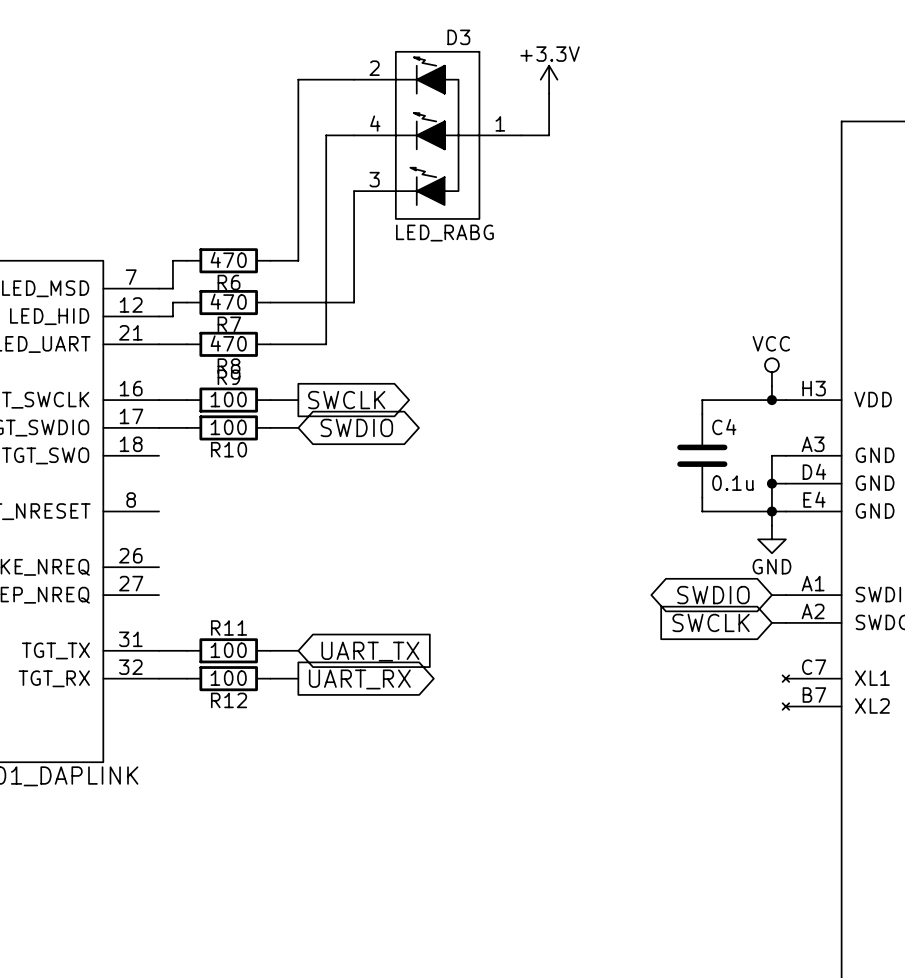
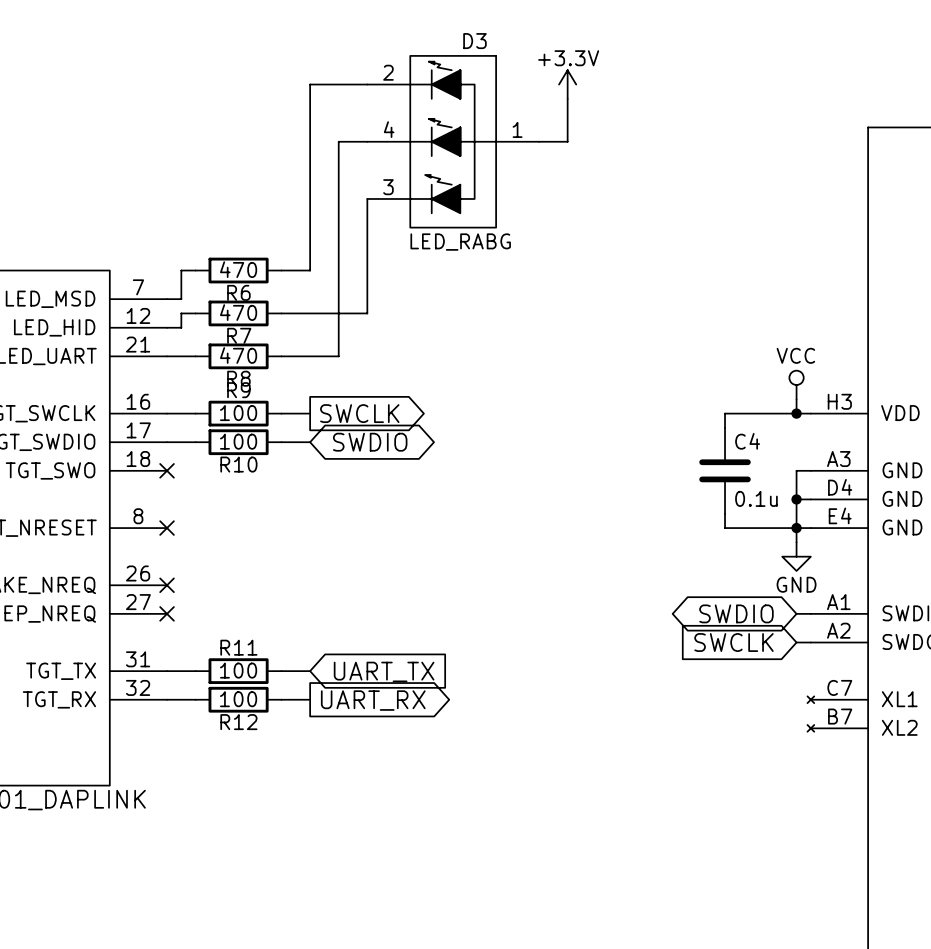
no-connect mark: none -> (167, 470)
no-connect mark: none -> (167, 528)
no-connect mark: none -> (167, 585)
no-connect mark: none -> (167, 613)

